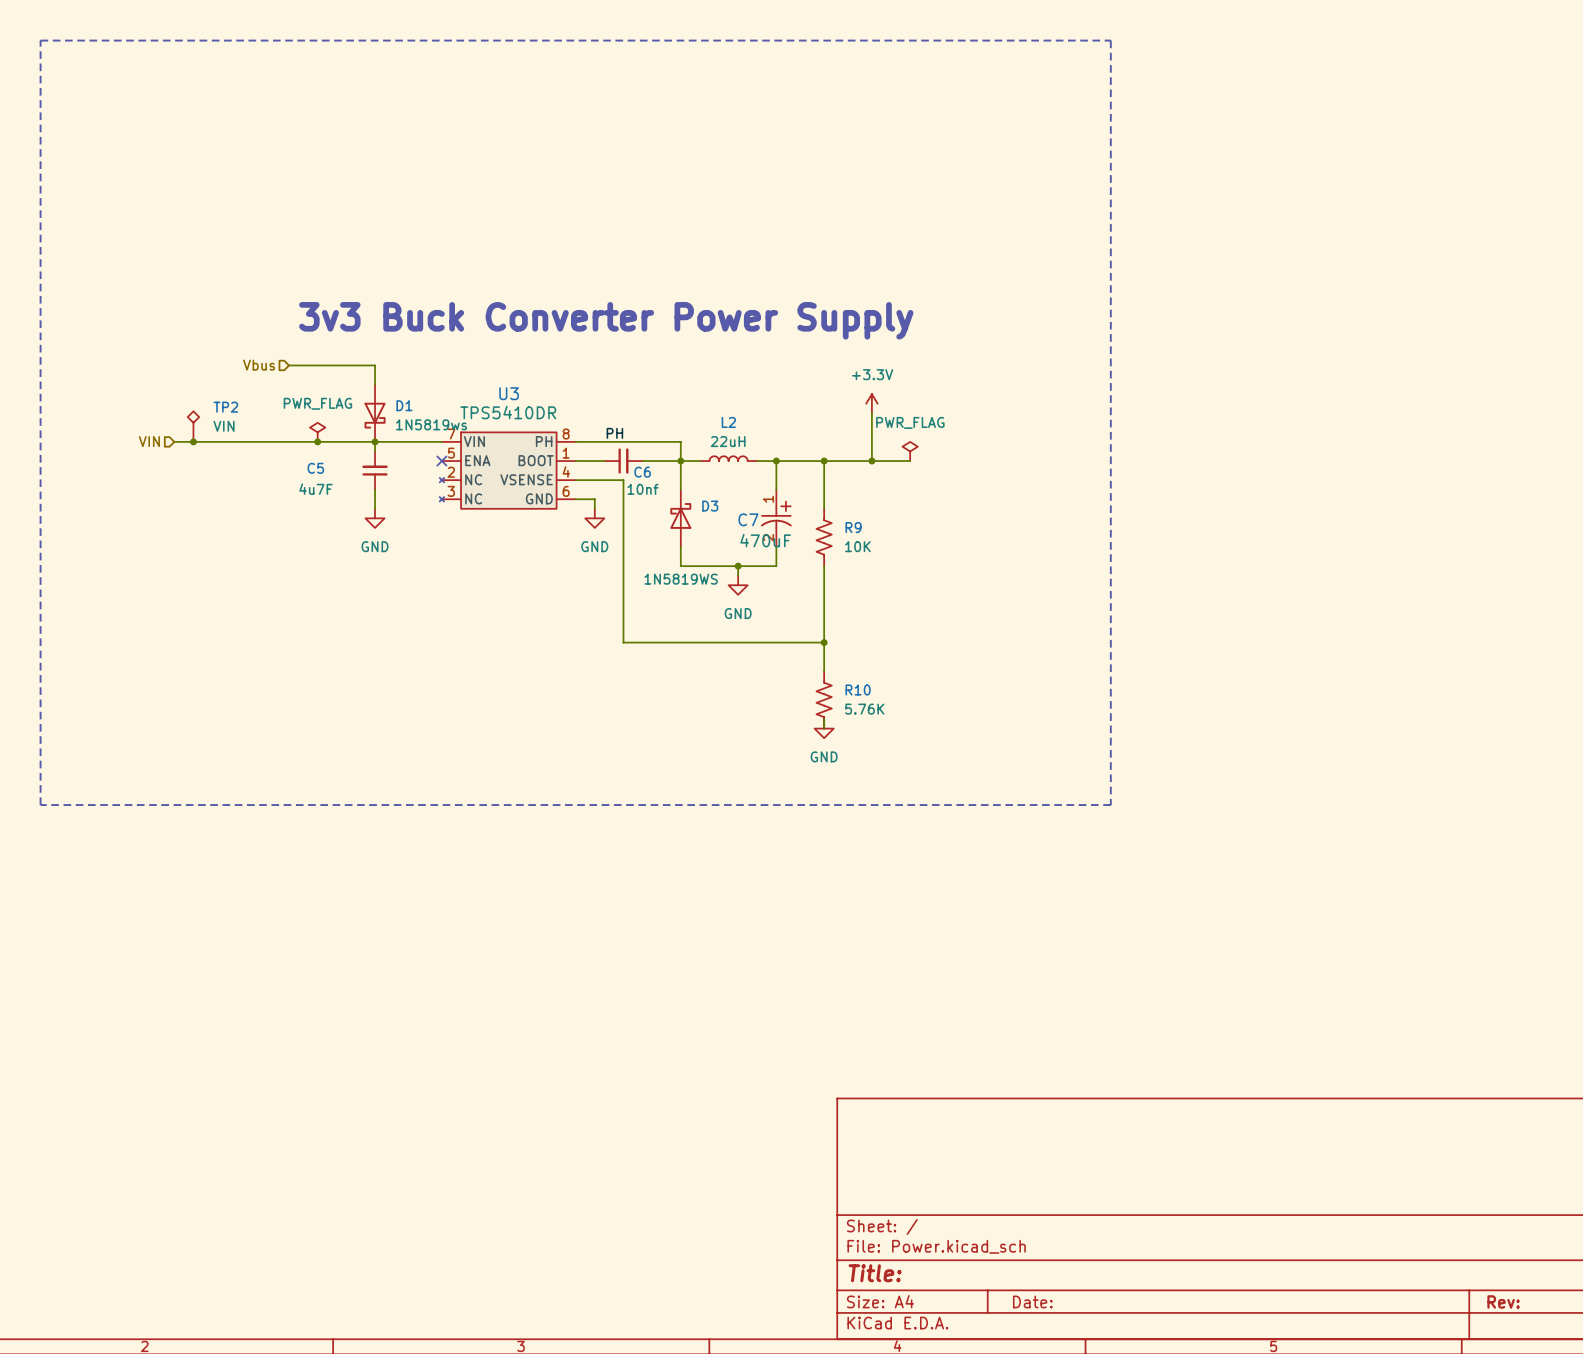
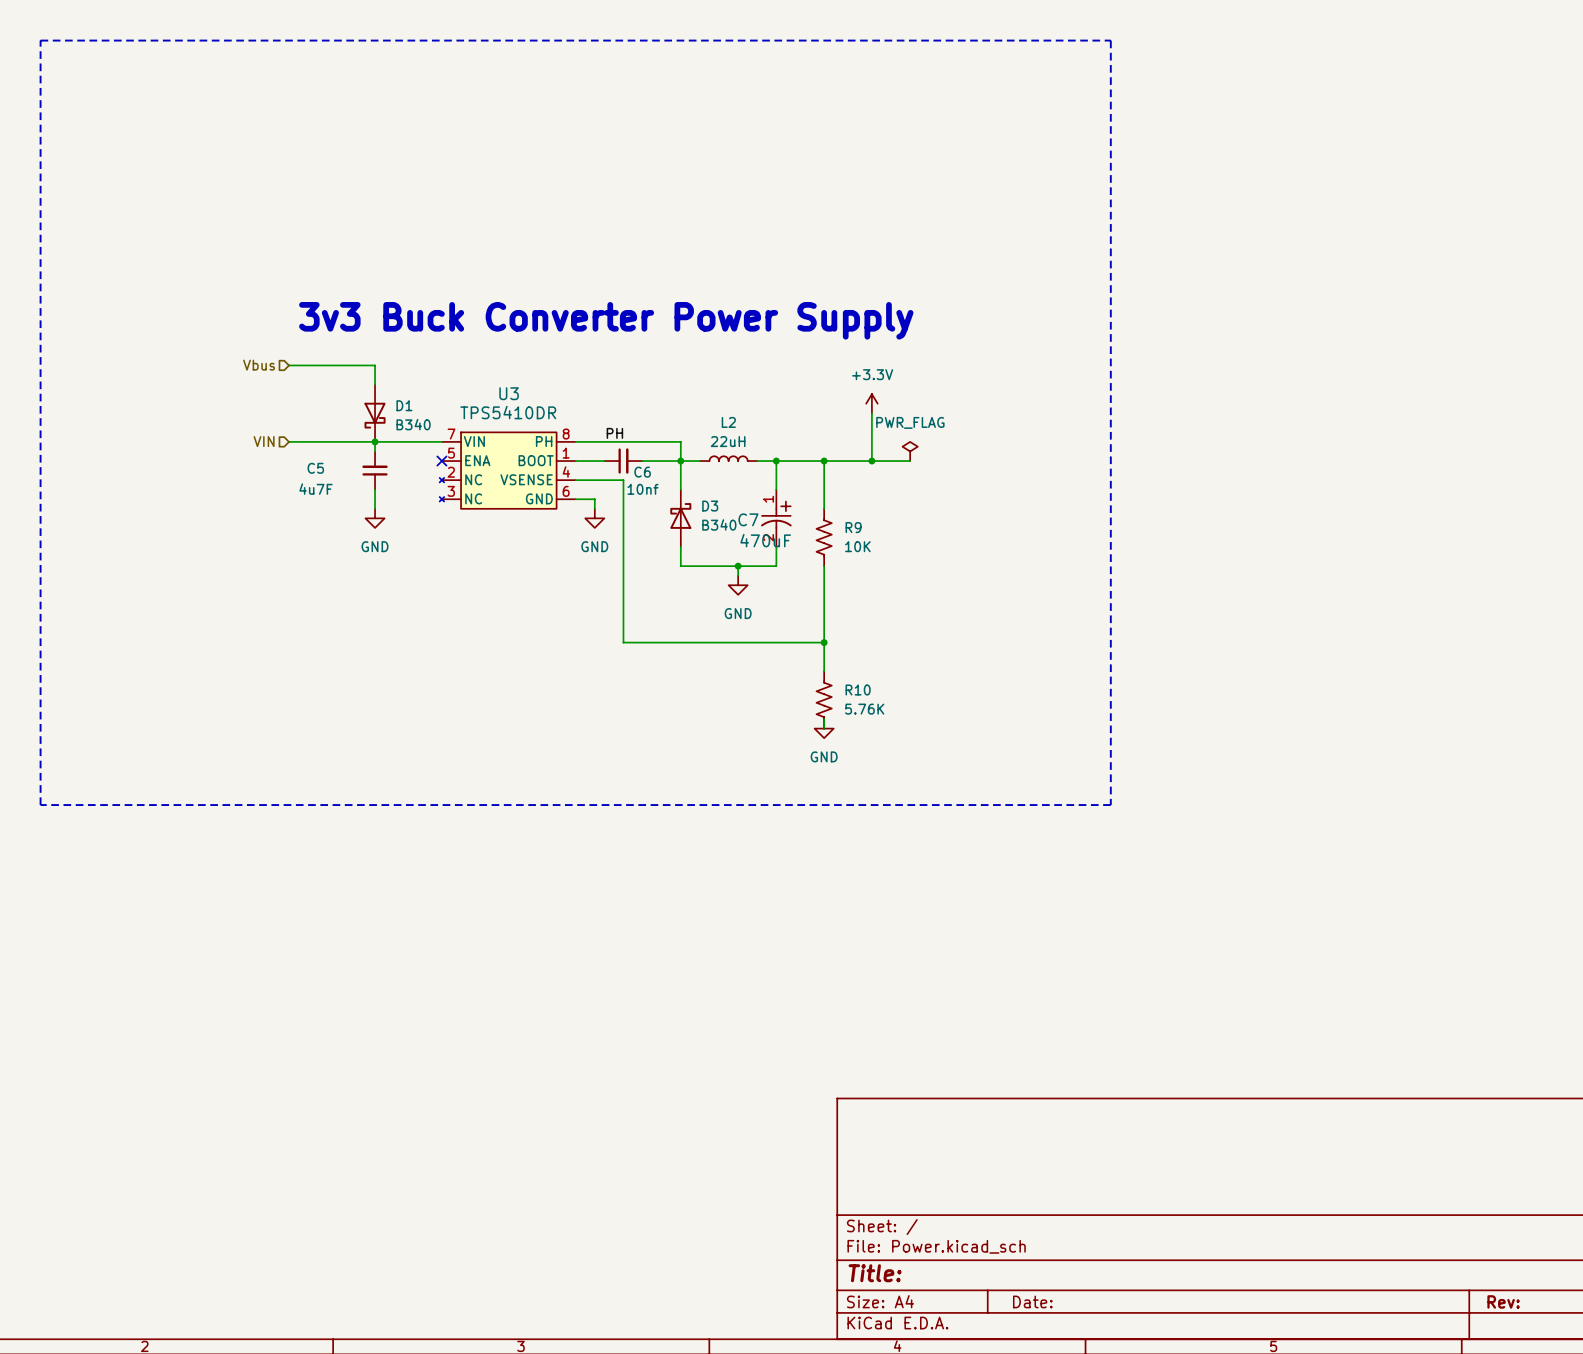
D1 value: 1N5819ws (431, 424) -> B340 (413, 424)
TP2: VIN (193, 426) -> none
power symbol: PWR_FLAG (317, 432) -> none
hierarchical label position: VIN (149, 441) -> VIN (264, 441)
wire: (174, 441) (289, 441) -> none
junction: (193, 441) -> none
junction: (317, 441) -> none
D3 value: 1N5819WS (681, 579) -> B340 (719, 524)

